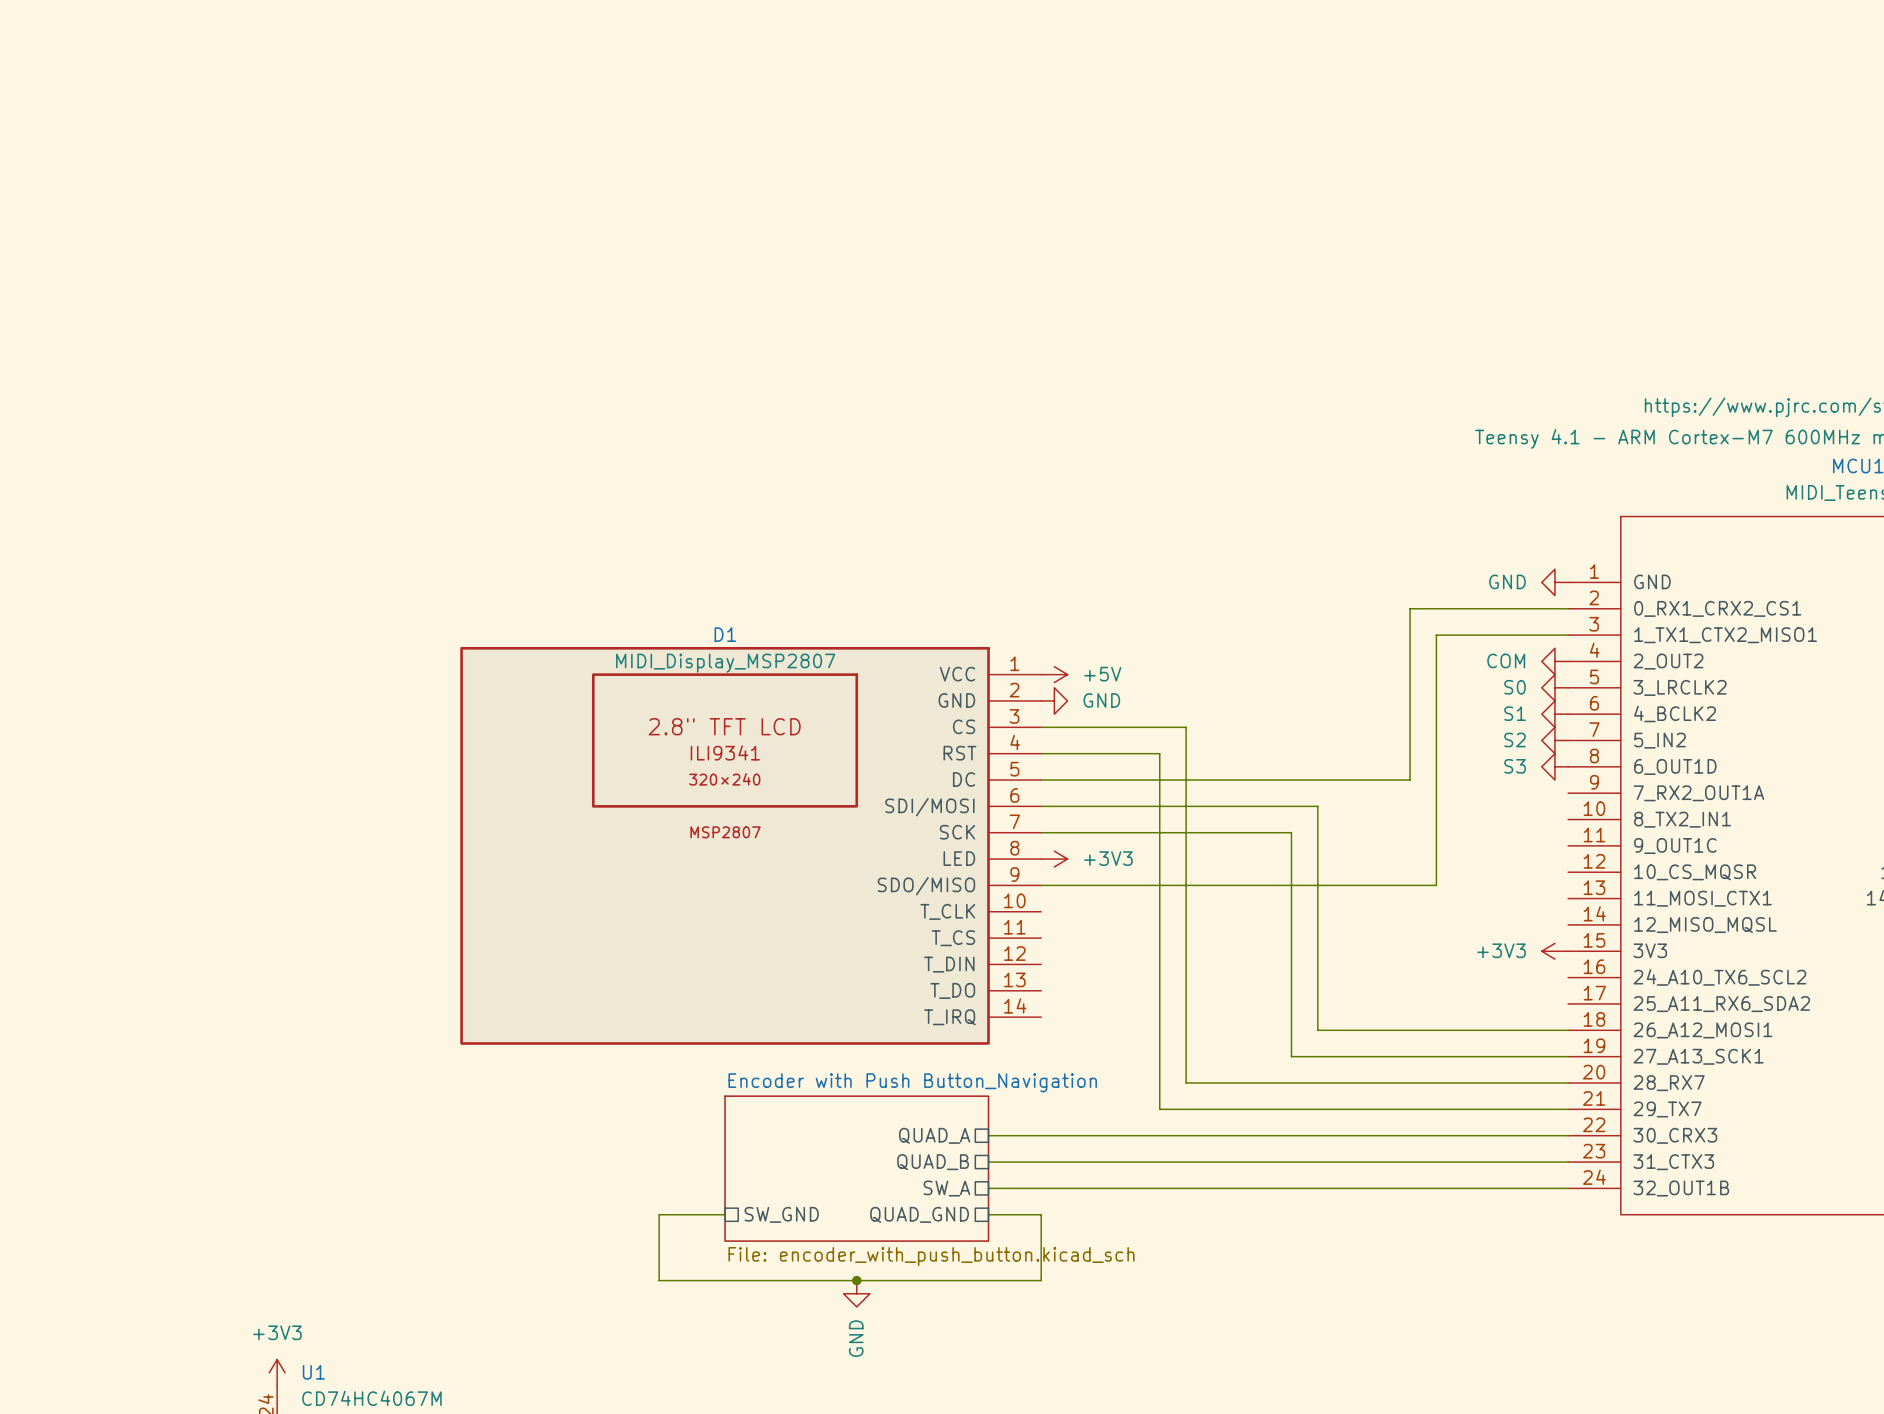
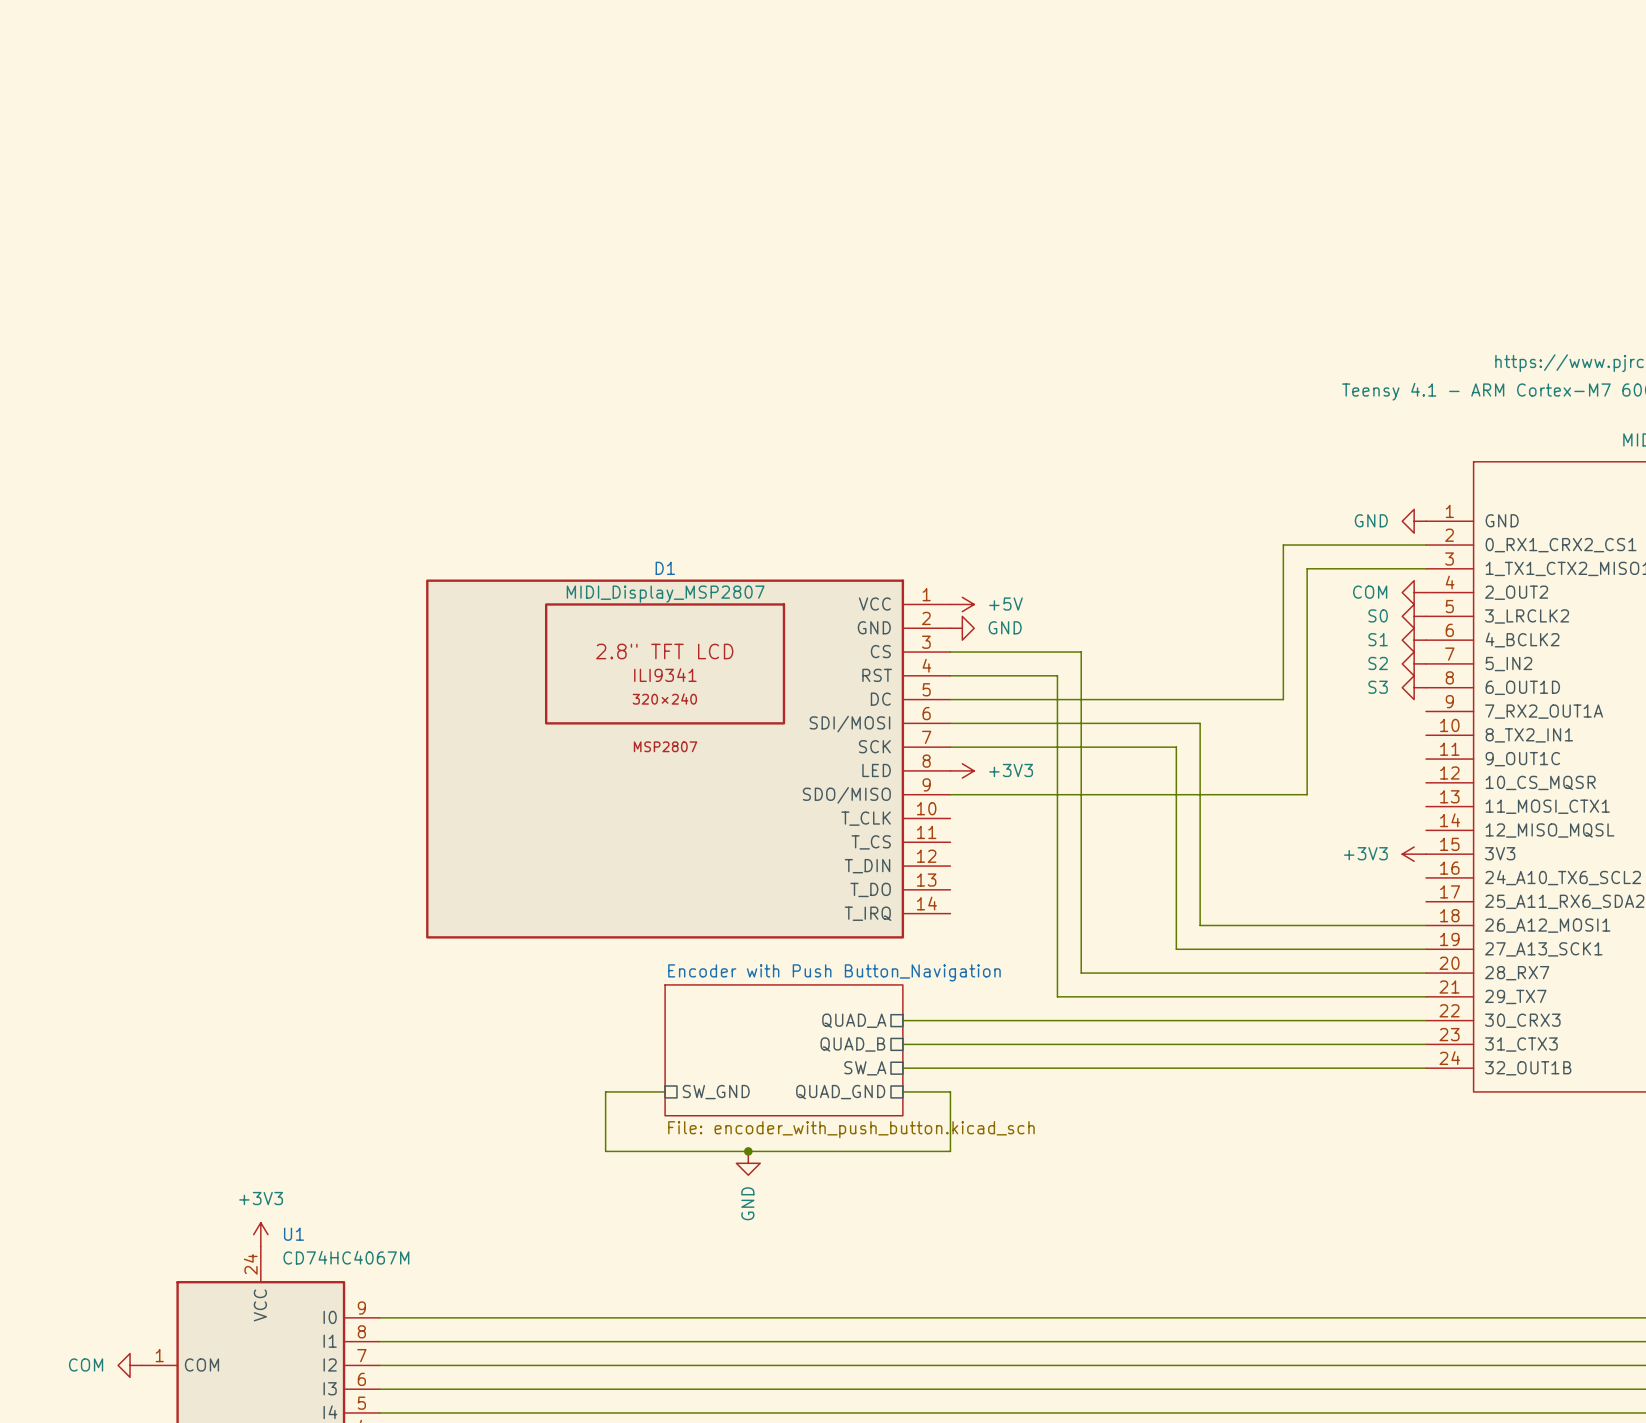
junction position: (856, 1280) -> (748, 1151)
power symbol position: GND (856, 1293) -> GND (748, 1163)

